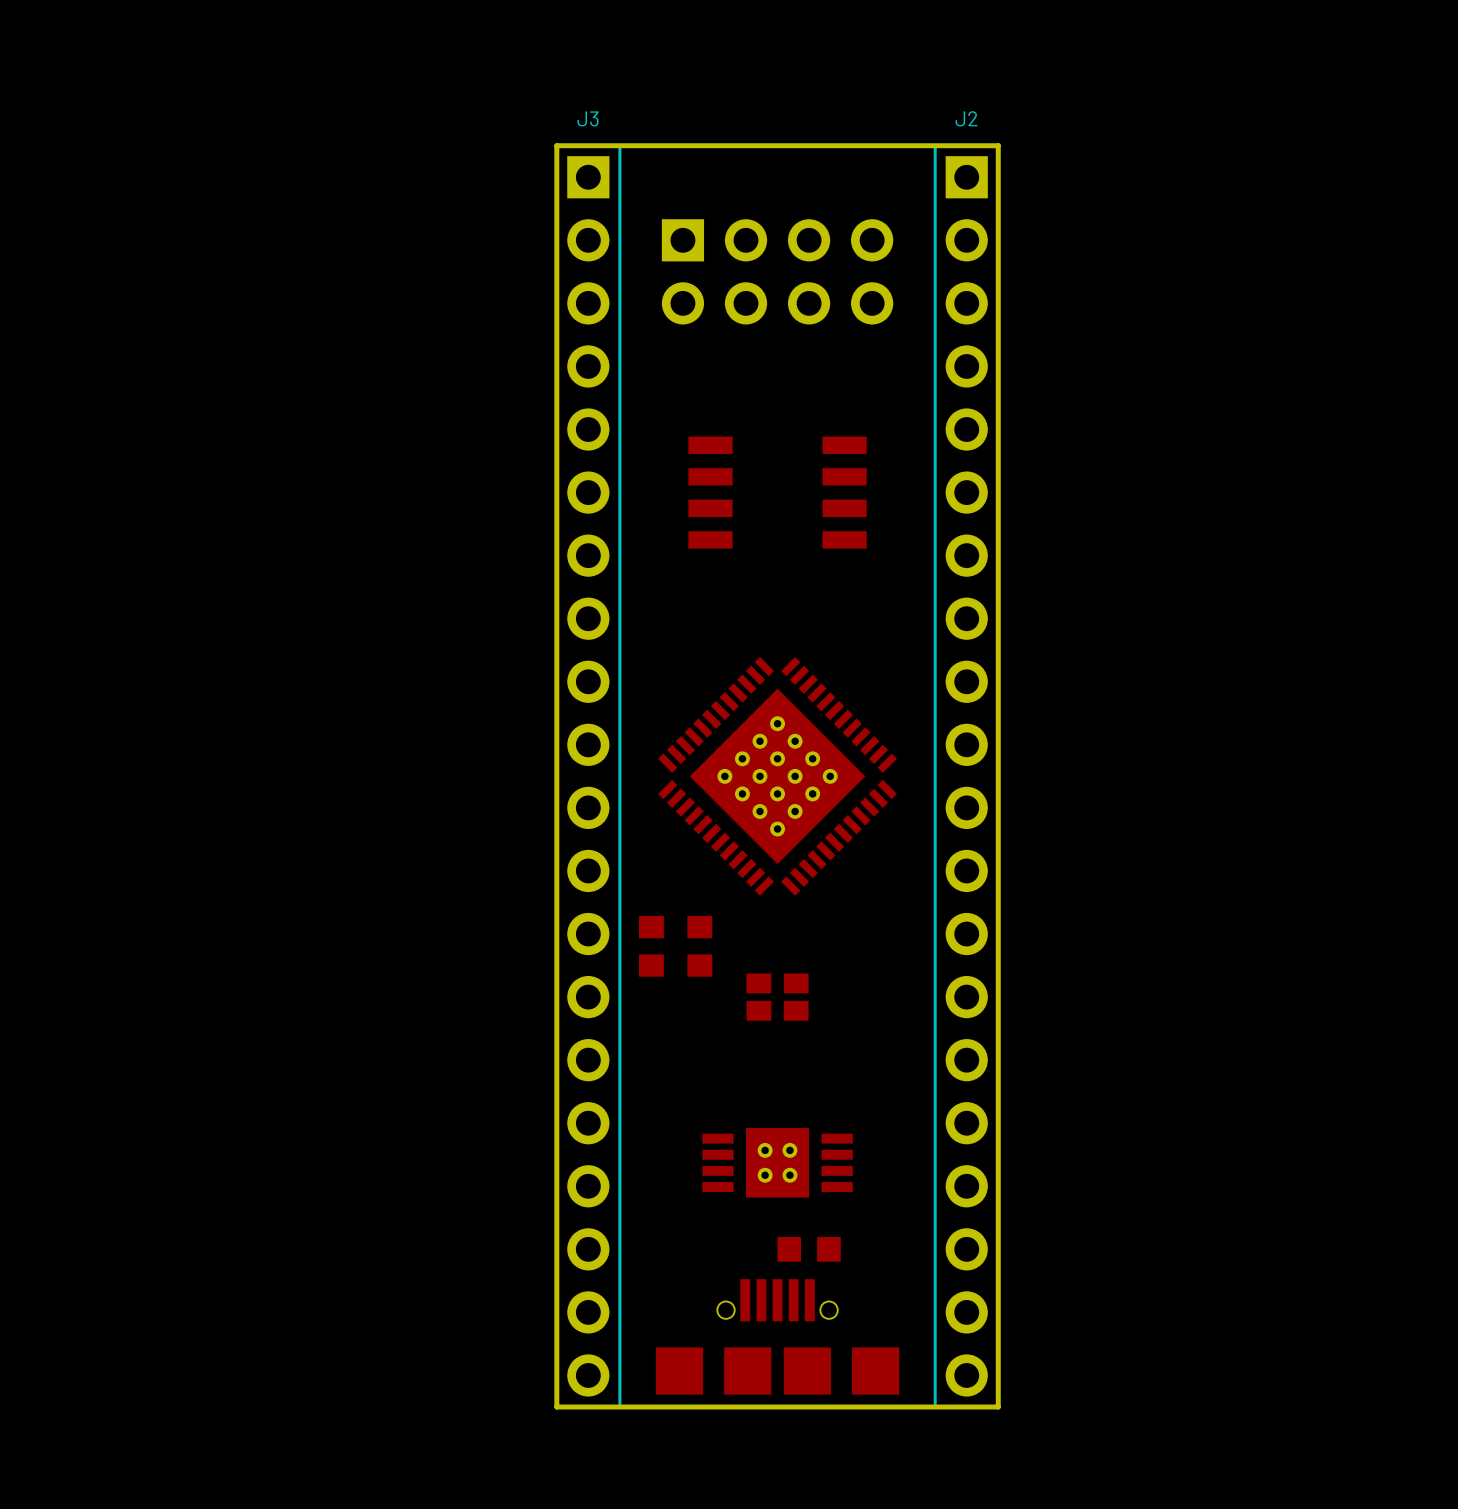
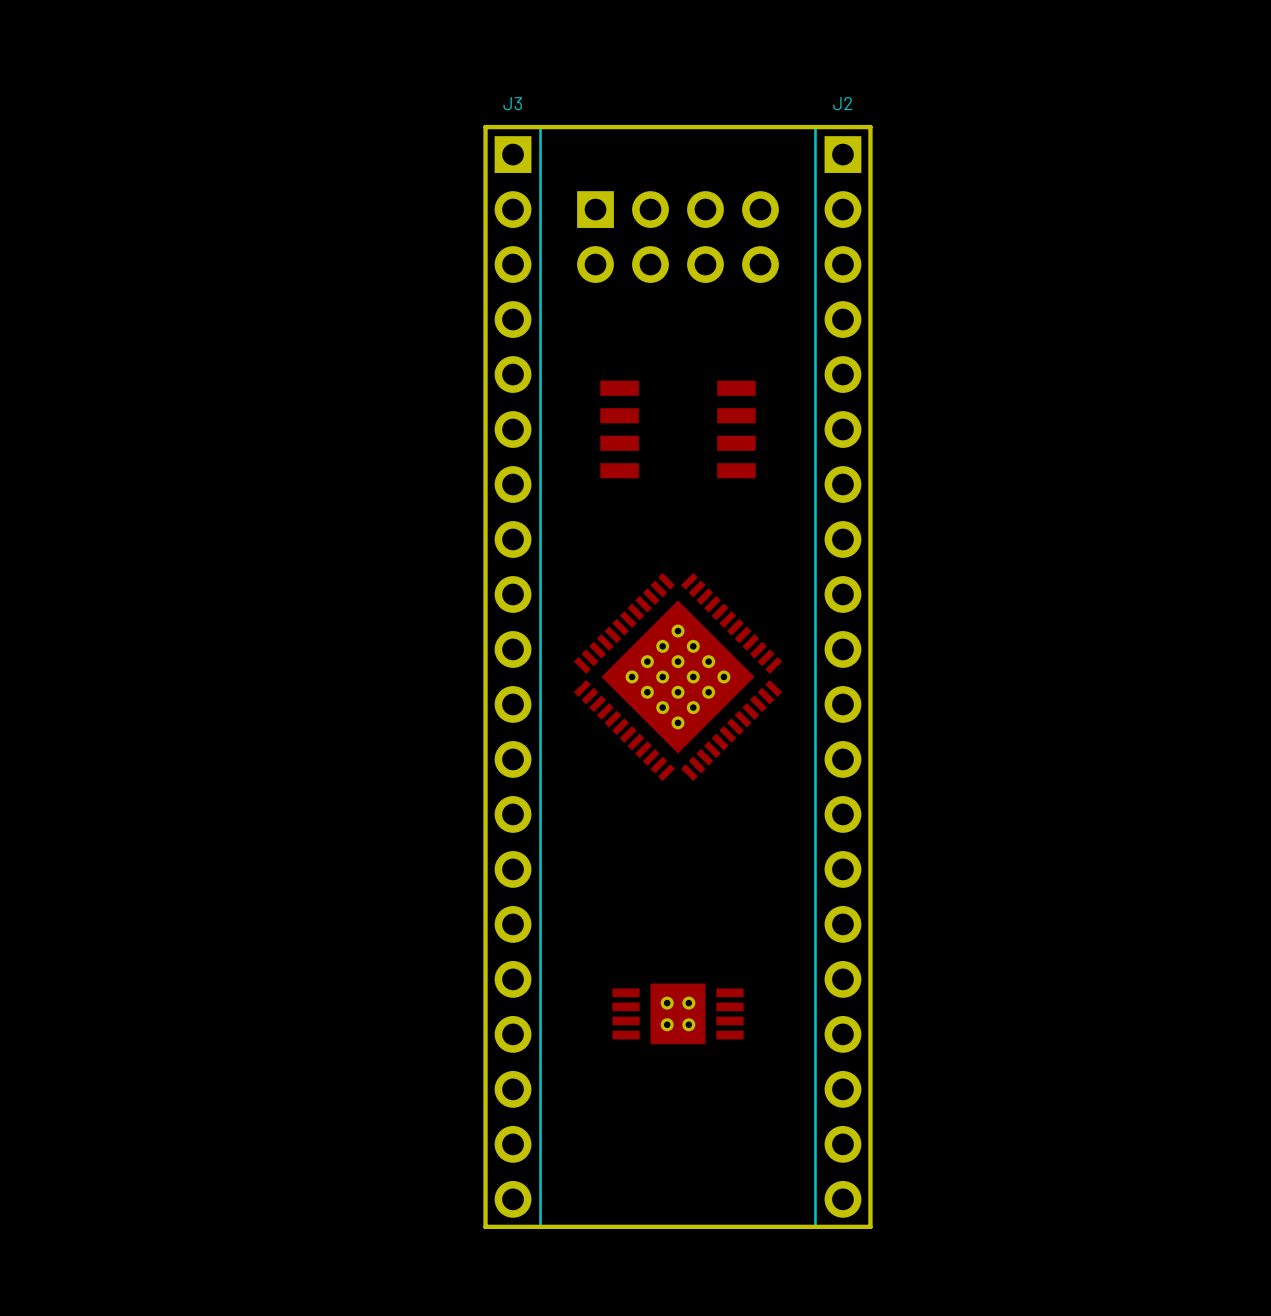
part: (675, 946) -> none
part: (777, 997) -> none
part: (809, 1249) -> none
part: (777, 1336) -> none

